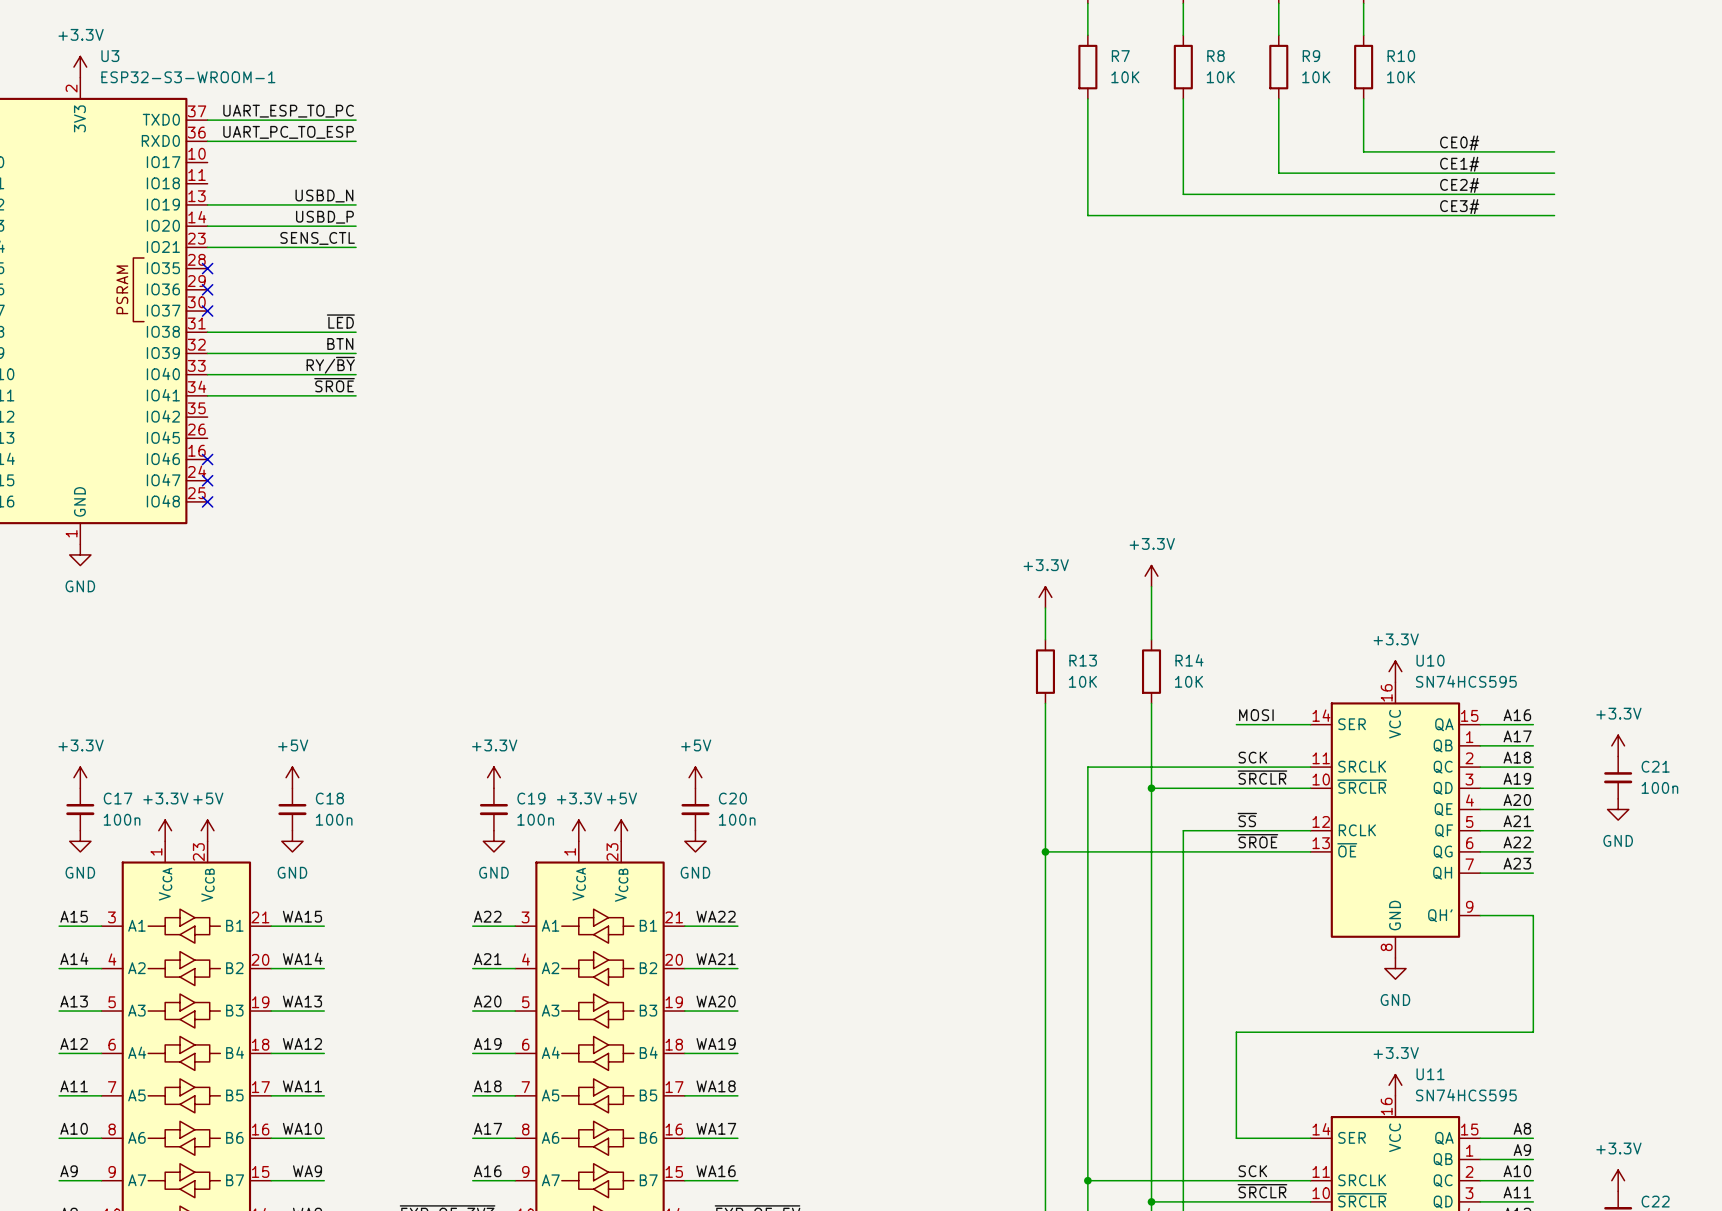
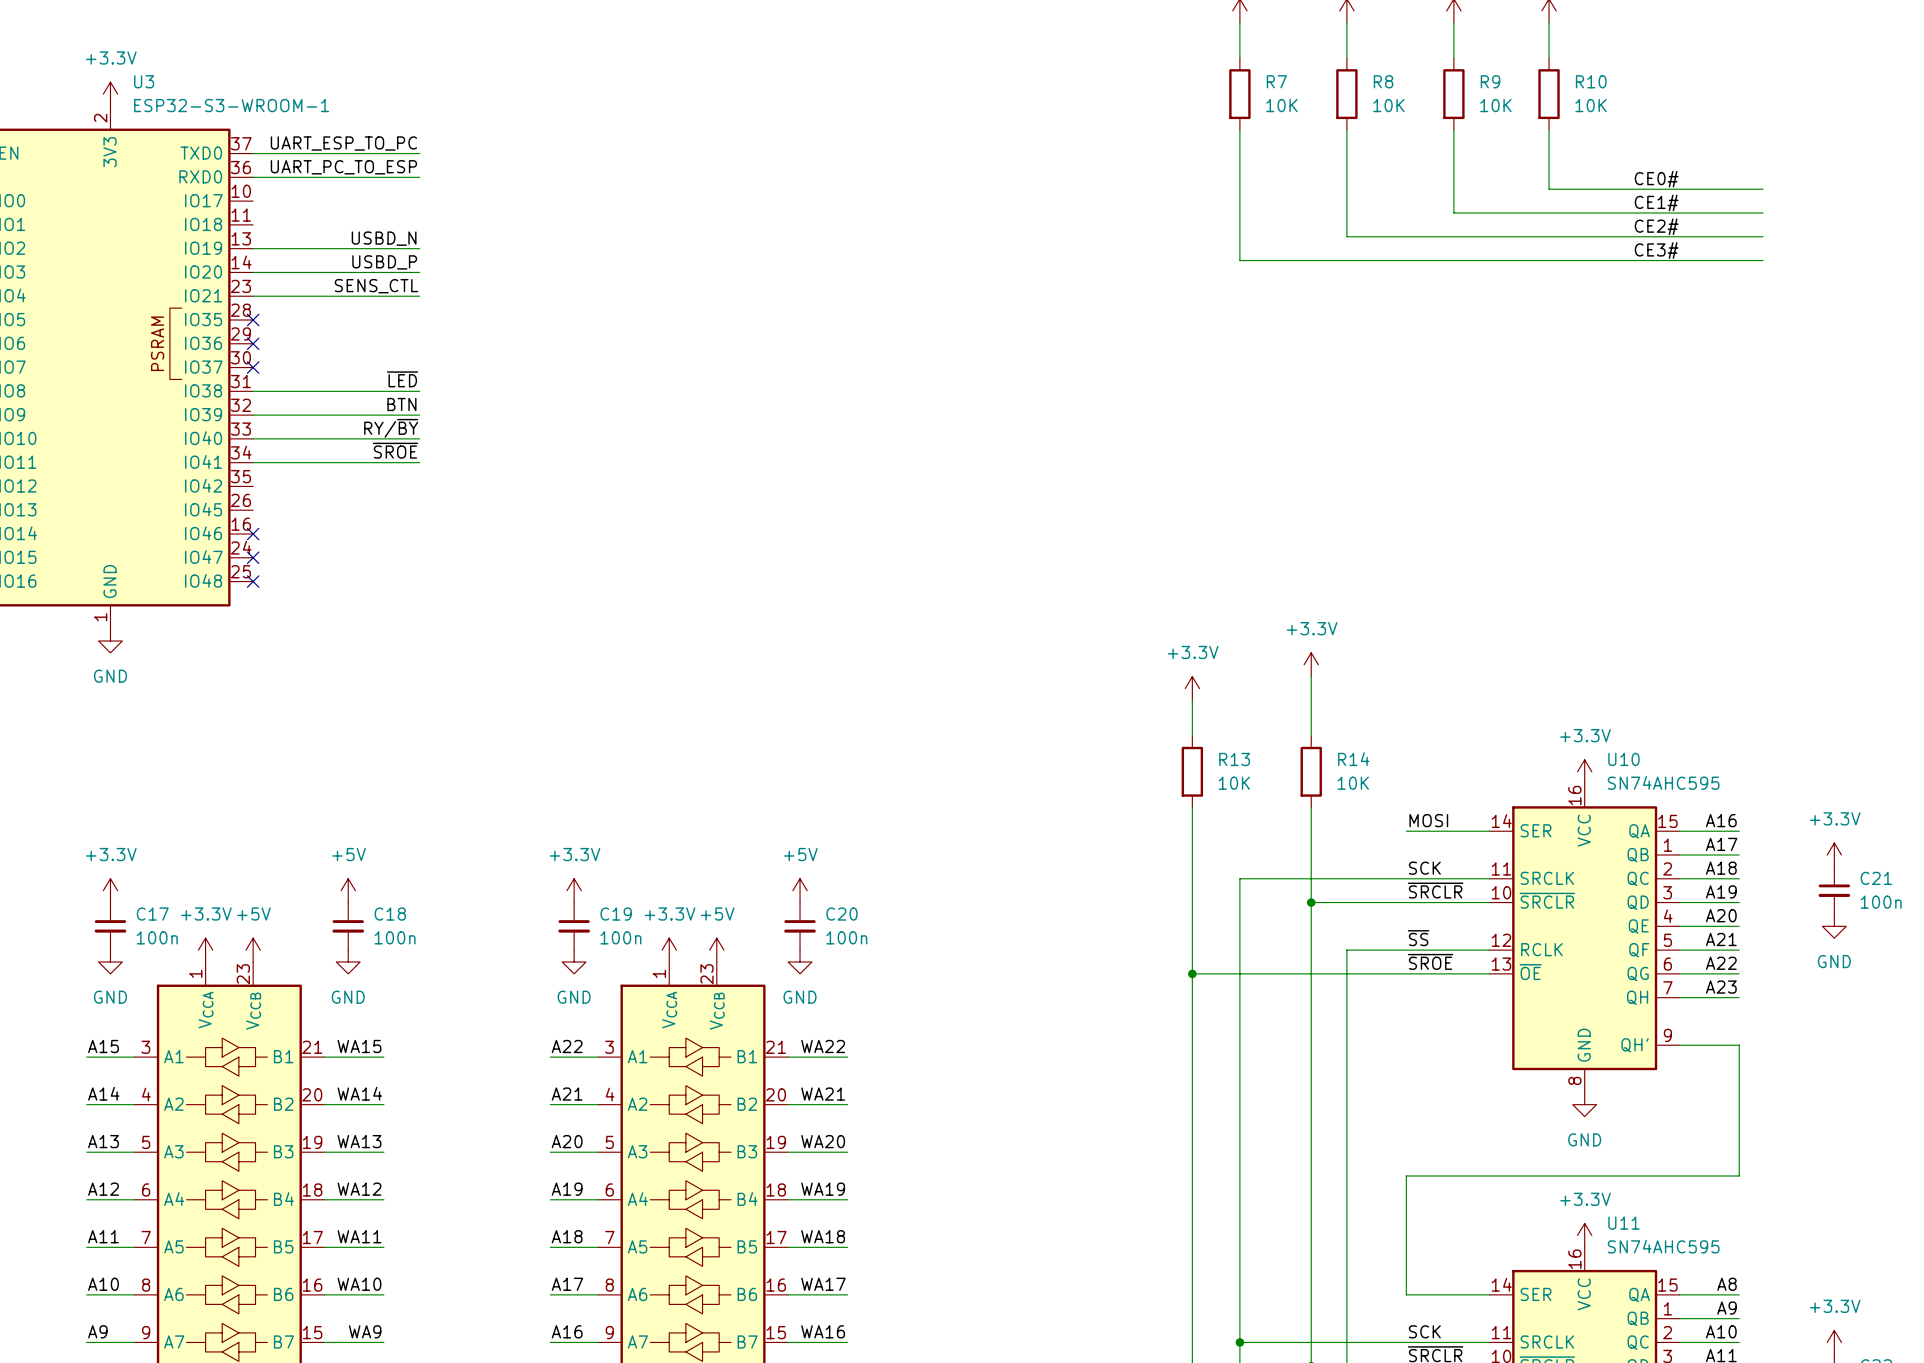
U10 value: SN74HCS595 (1466, 681) -> SN74AHC595 (1663, 782)
U11 value: SN74HCS595 (1466, 1095) -> SN74AHC595 (1663, 1246)

